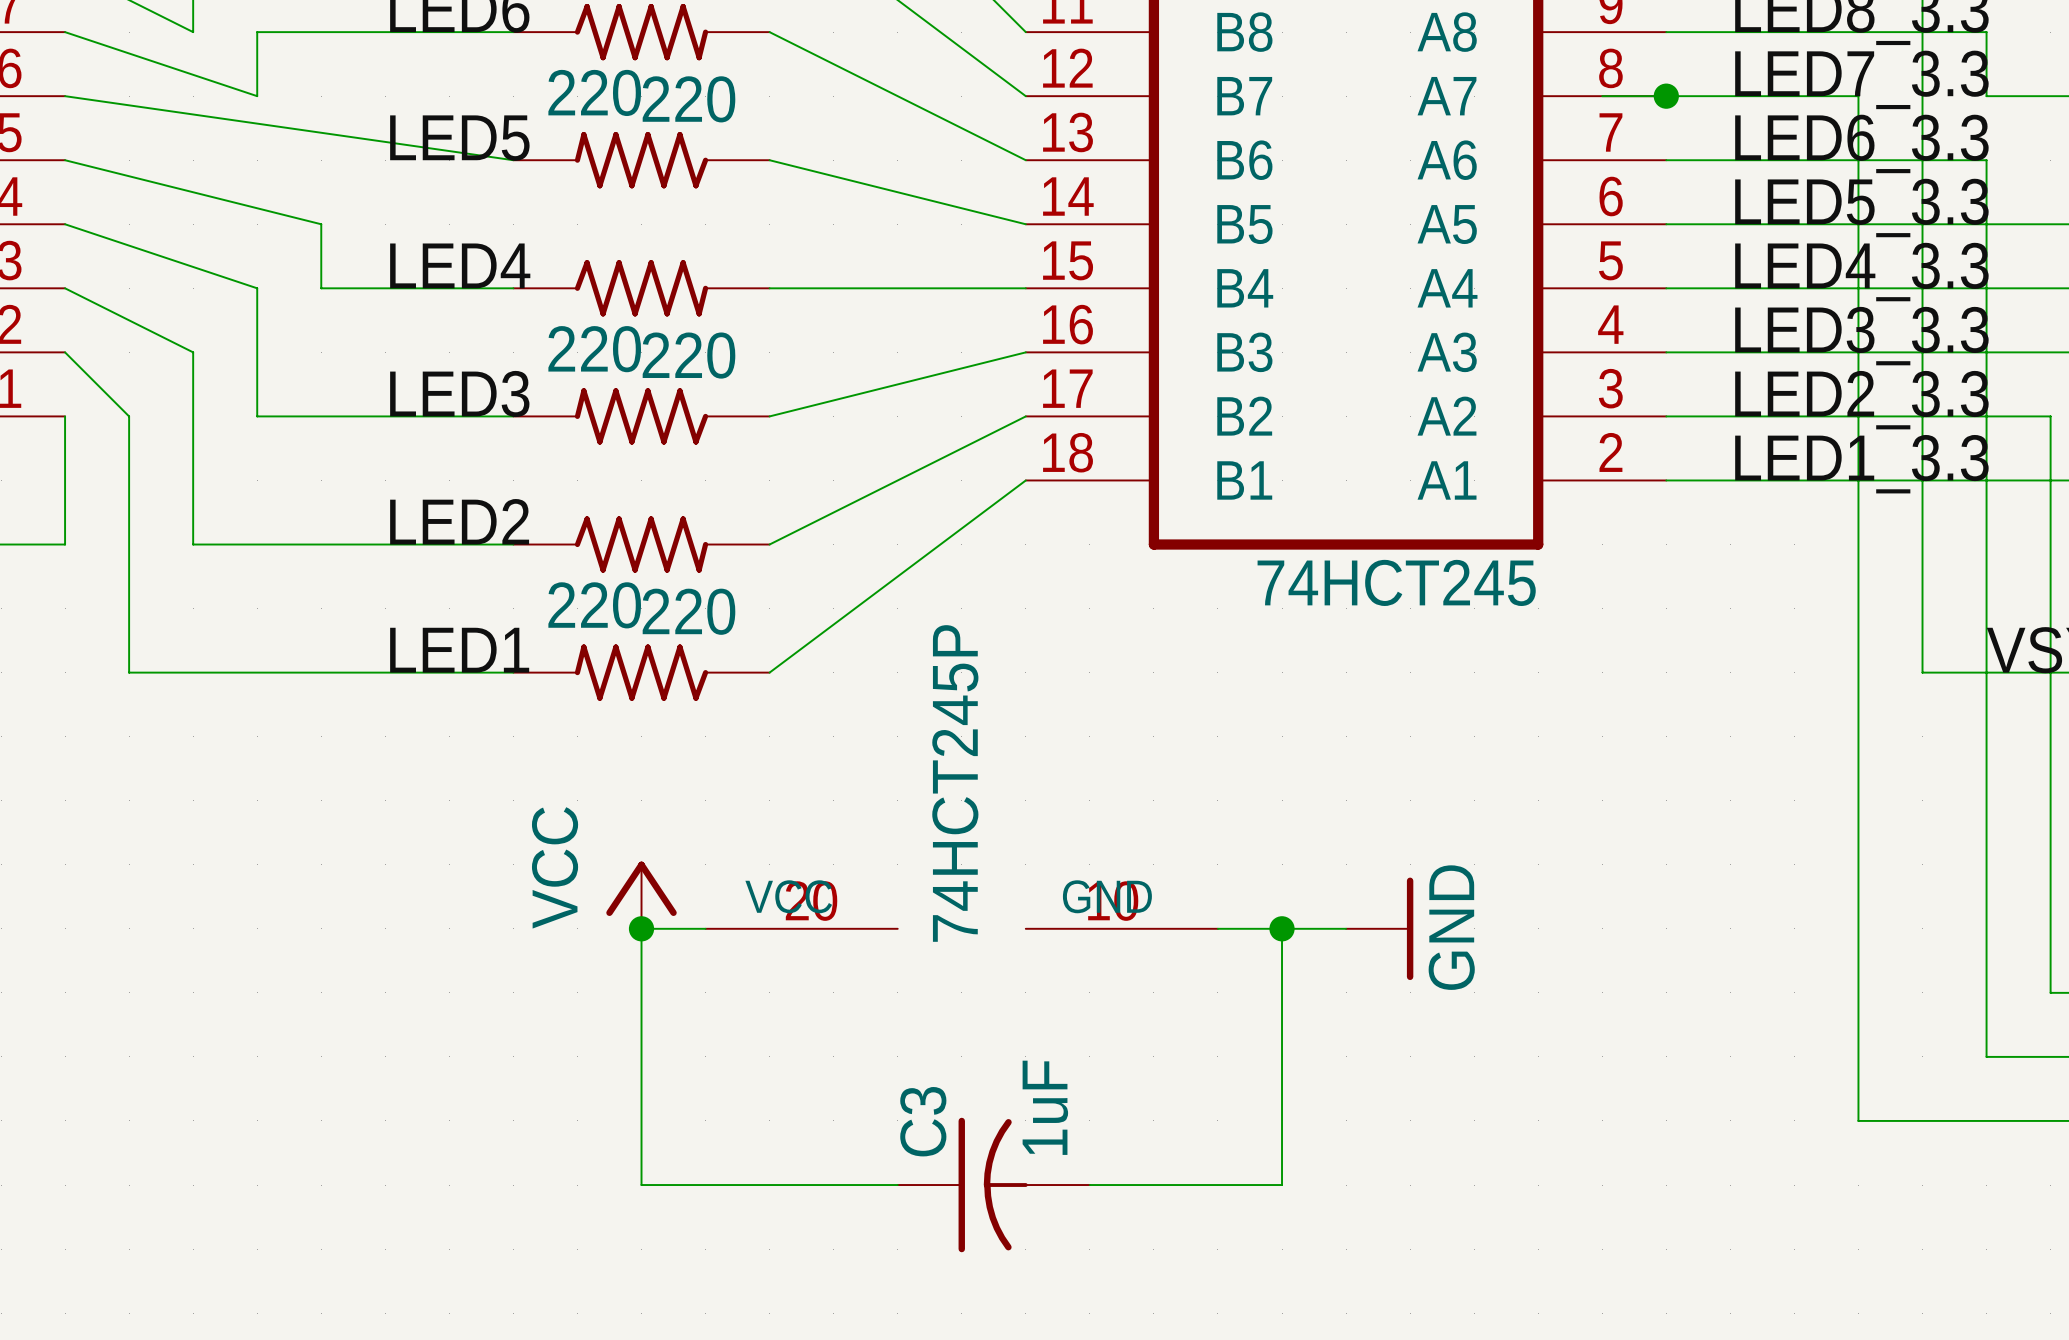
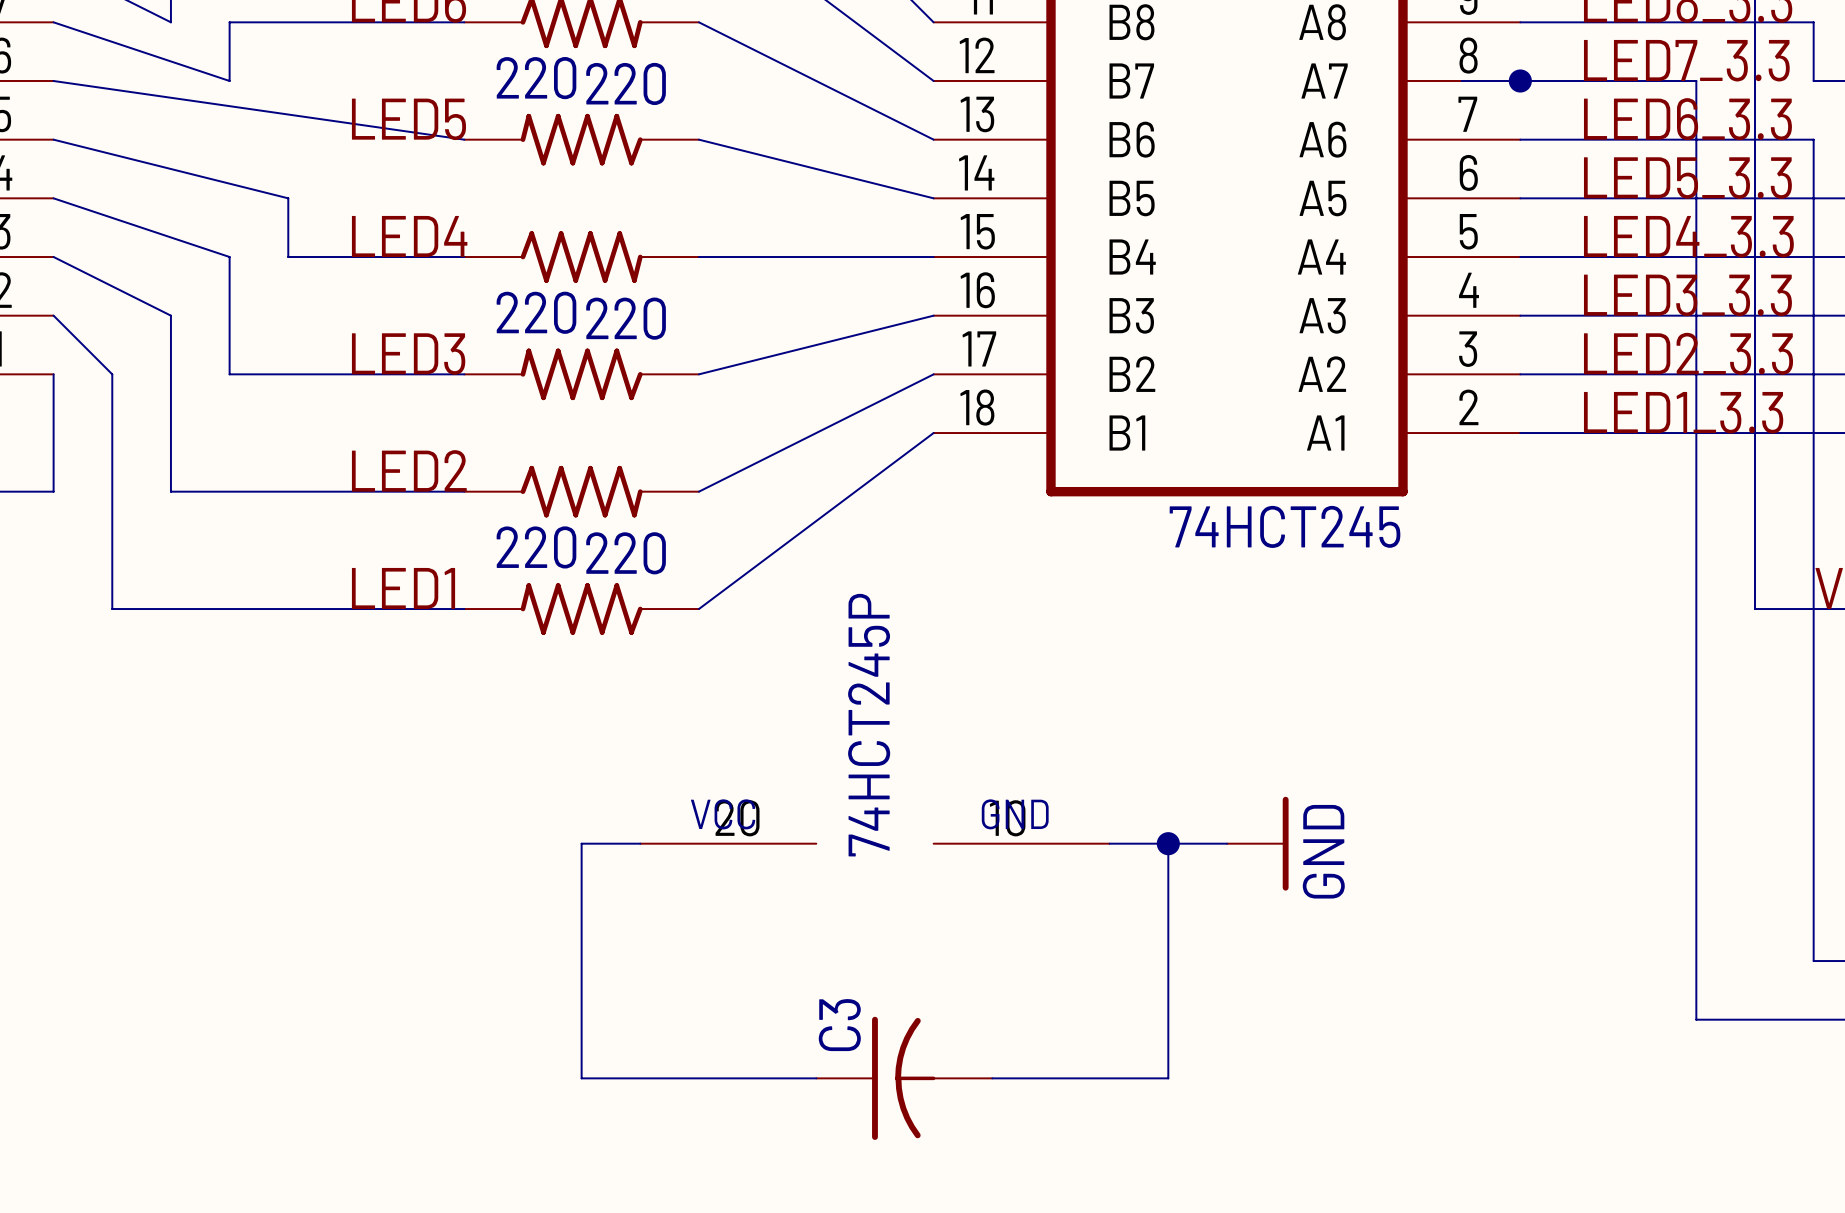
power symbol: VCC (641, 895) -> none
junction: (641, 928) -> none
C3 value: 1uF (1045, 1107) -> none

